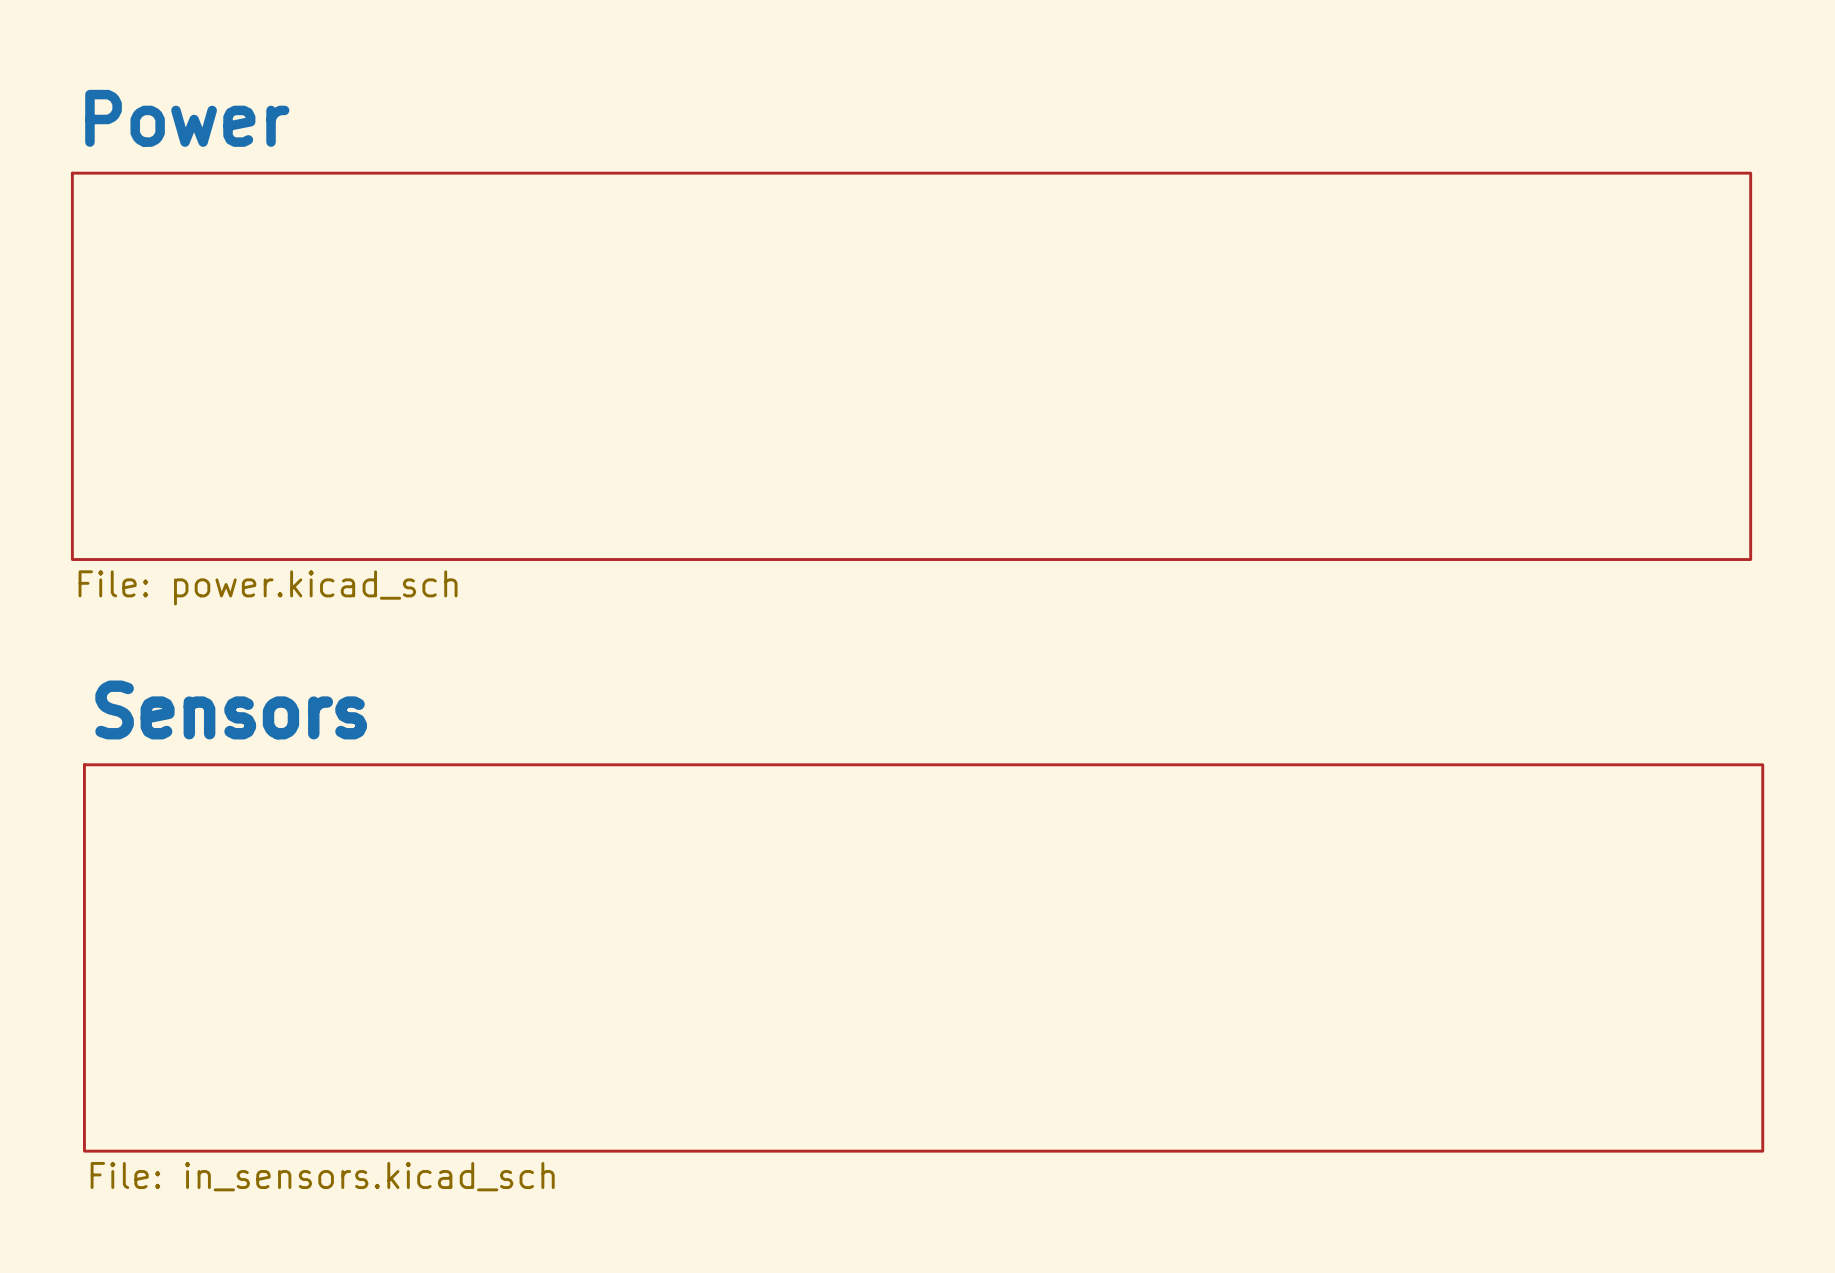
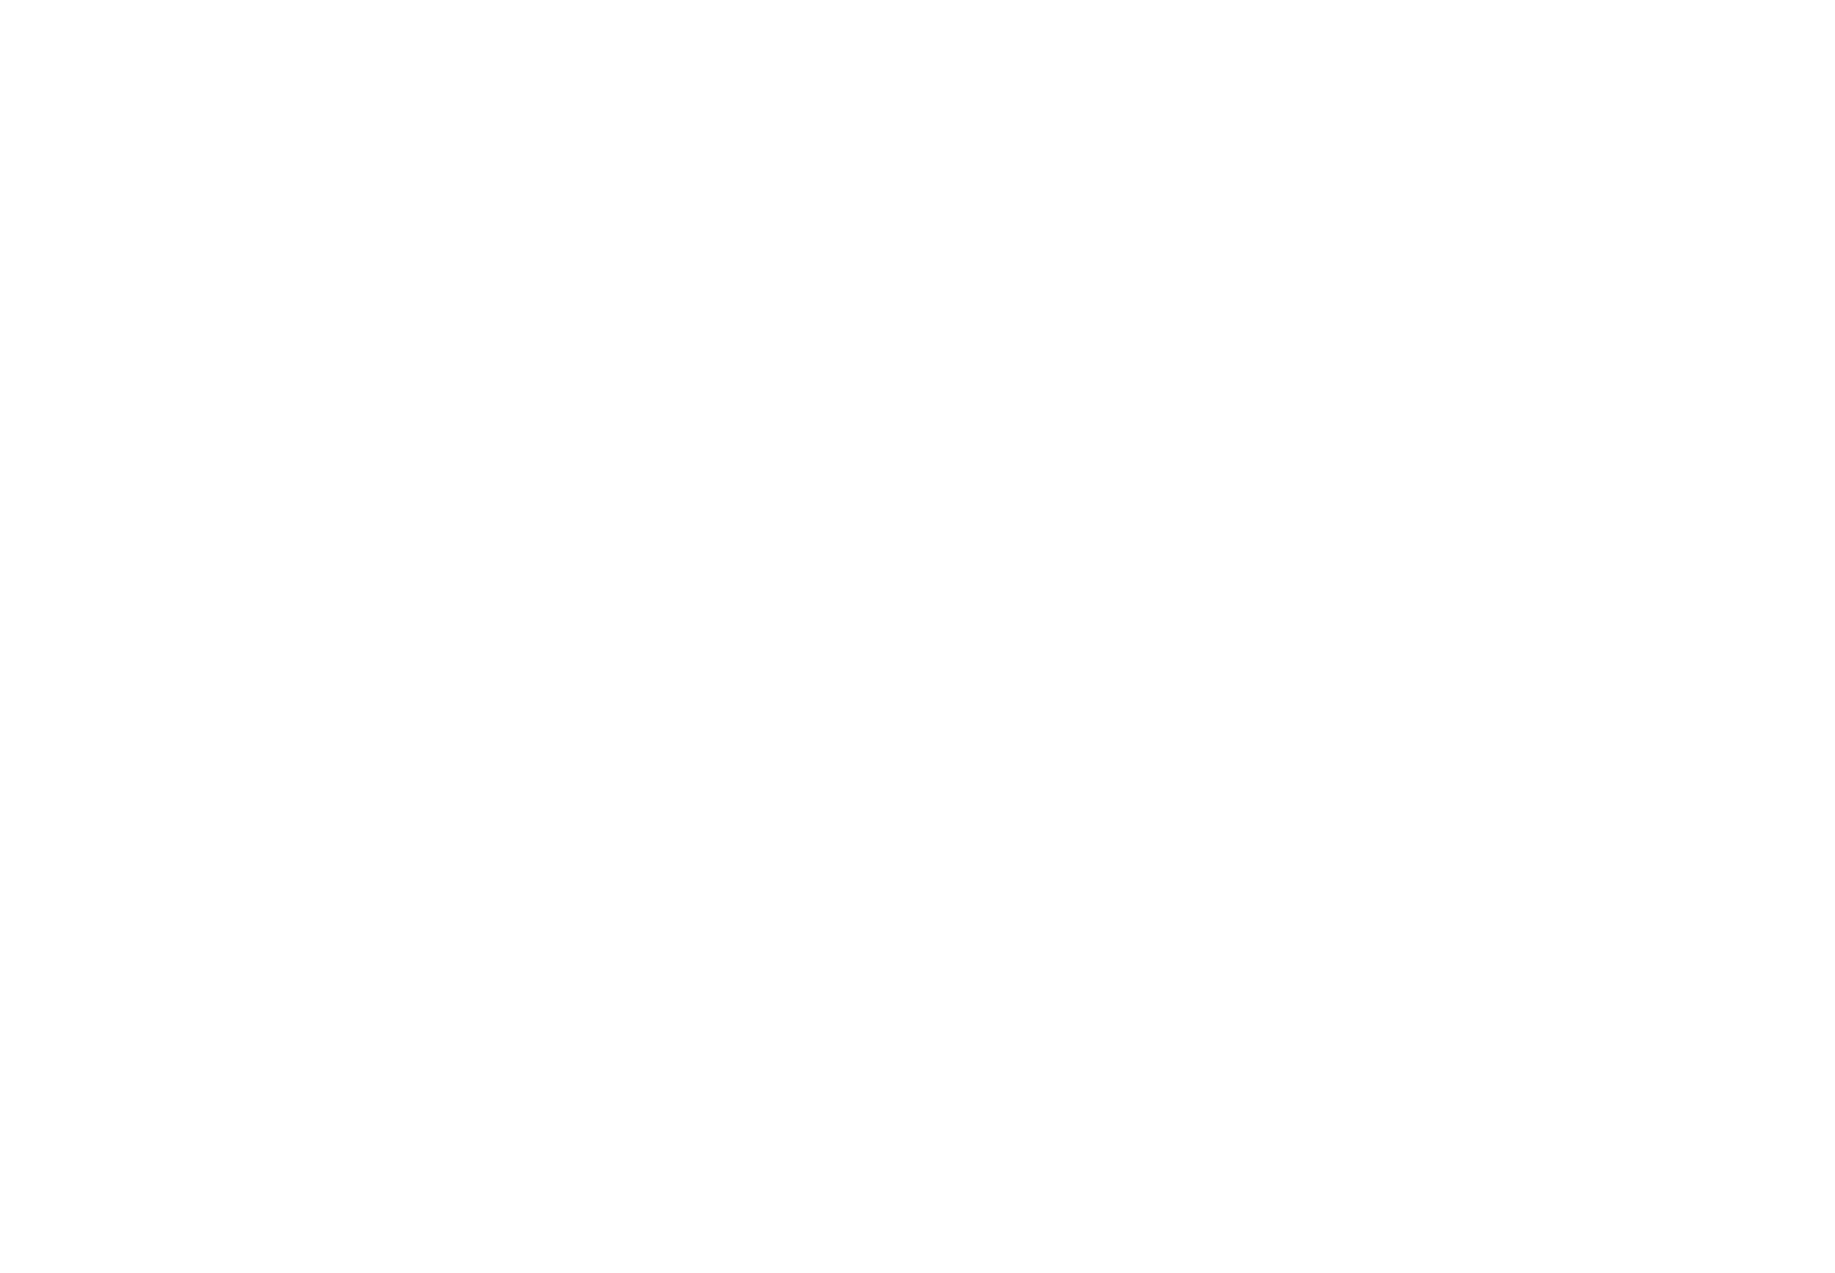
sheet Power: File: power.kicad_sch (911, 366) -> none
sheet Sensors: File: in_sensors.kicad_sch (923, 957) -> none

